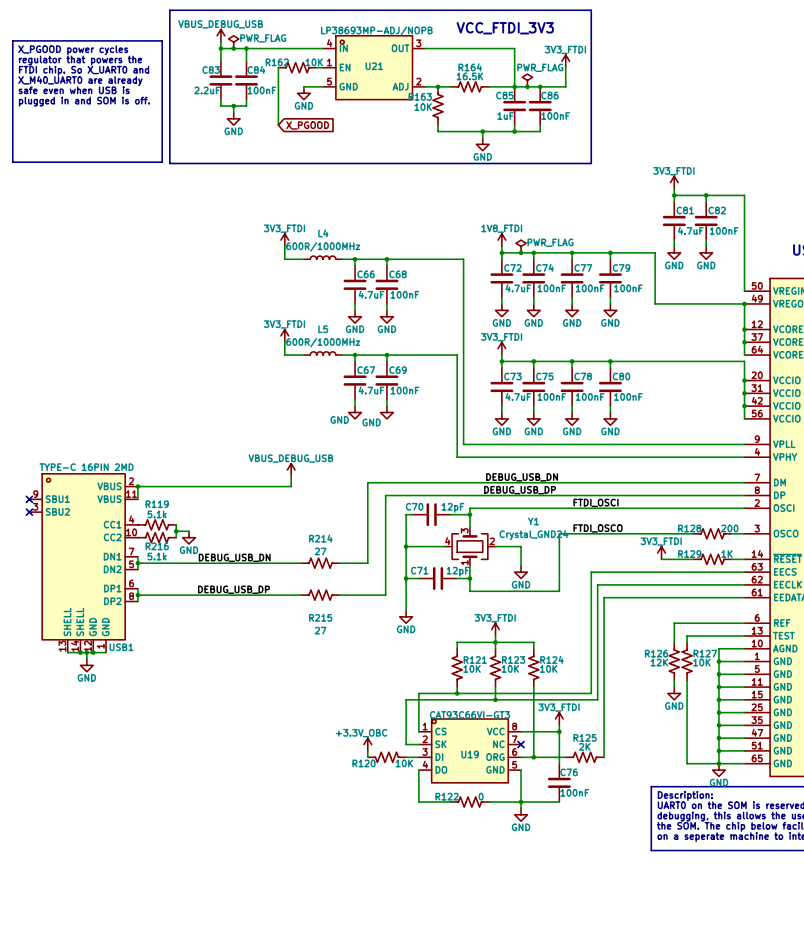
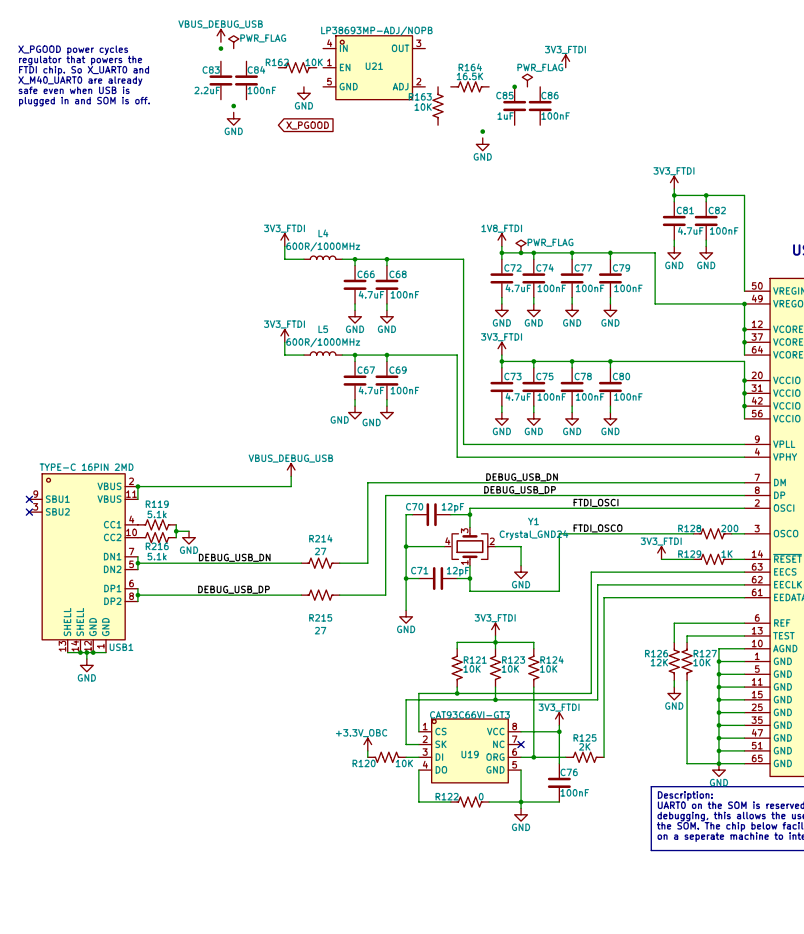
line: (169, 10) (591, 10) (591, 163) (169, 163) (169, 10) -> none
text: VCC_FTDI_3V3 (505, 28) -> none
line: (12, 40) (162, 40) (162, 162) (12, 162) (12, 40) -> none
wire: (220, 42) (220, 61) -> none
wire: (220, 48) (323, 48) -> none
junction: (233, 48) -> none
wire: (246, 48) (246, 61) -> none
junction: (246, 48) -> none
wire: (425, 48) (514, 48) (514, 86) -> none
wire: (278, 67) (278, 125) -> none
wire: (316, 67) (323, 67) -> none
wire: (565, 67) (565, 86) (489, 86) -> none
wire: (303, 86) (323, 86) -> none
wire: (425, 86) (450, 86) -> none
junction: (438, 86) -> none
junction: (527, 86) -> none
junction: (540, 86) -> none
wire: (220, 99) (220, 106) (246, 106) (246, 99) -> none
wire: (233, 106) (233, 112) -> none
wire: (438, 125) (438, 131) (540, 131) (540, 125) -> none
wire: (514, 125) (514, 131) -> none
wire: (482, 131) (482, 137) -> none
junction: (514, 131) -> none

